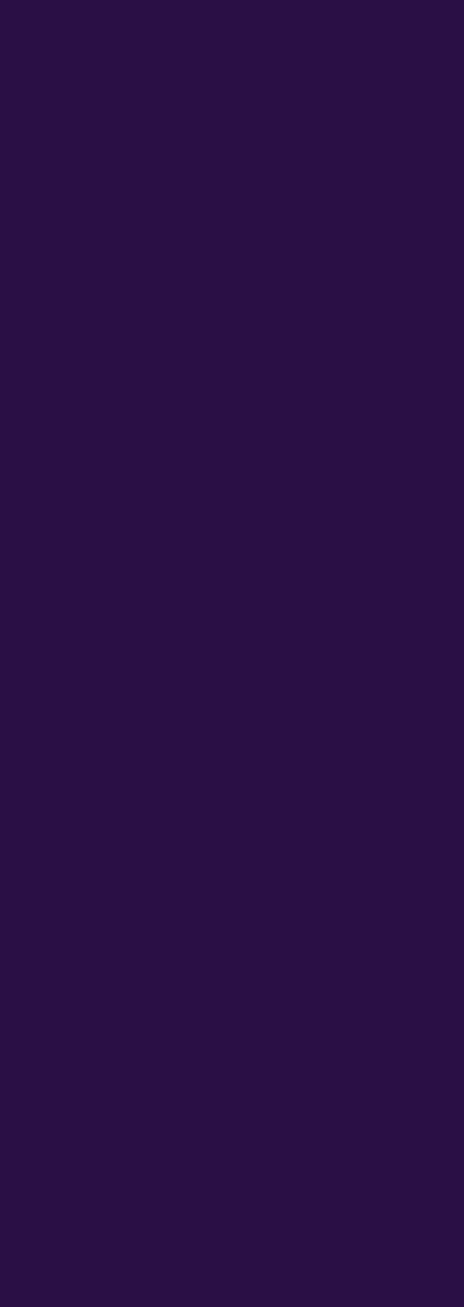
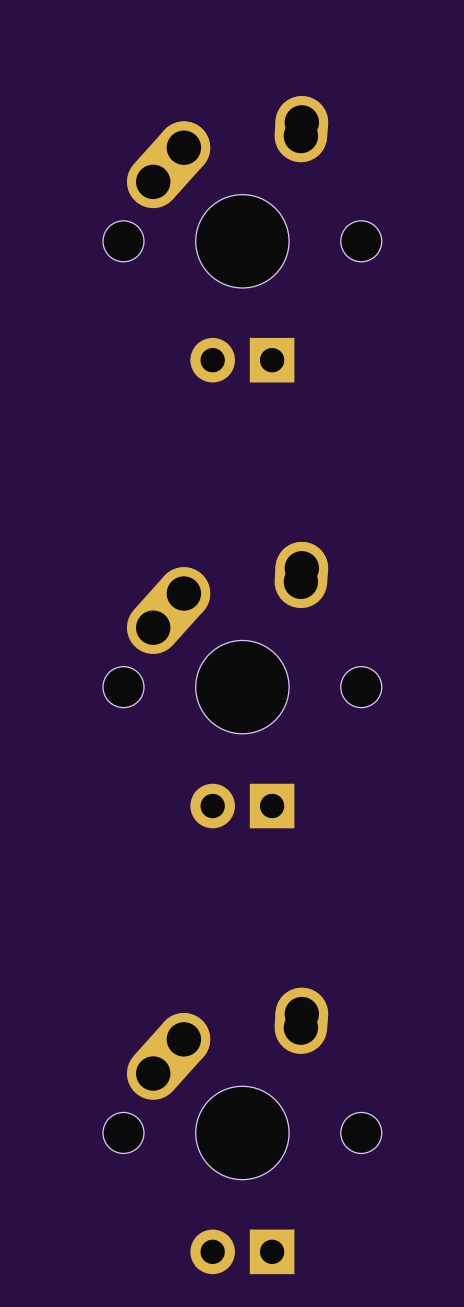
part: none -> (242, 239)
part: none -> (242, 685)
part: none -> (242, 1130)

